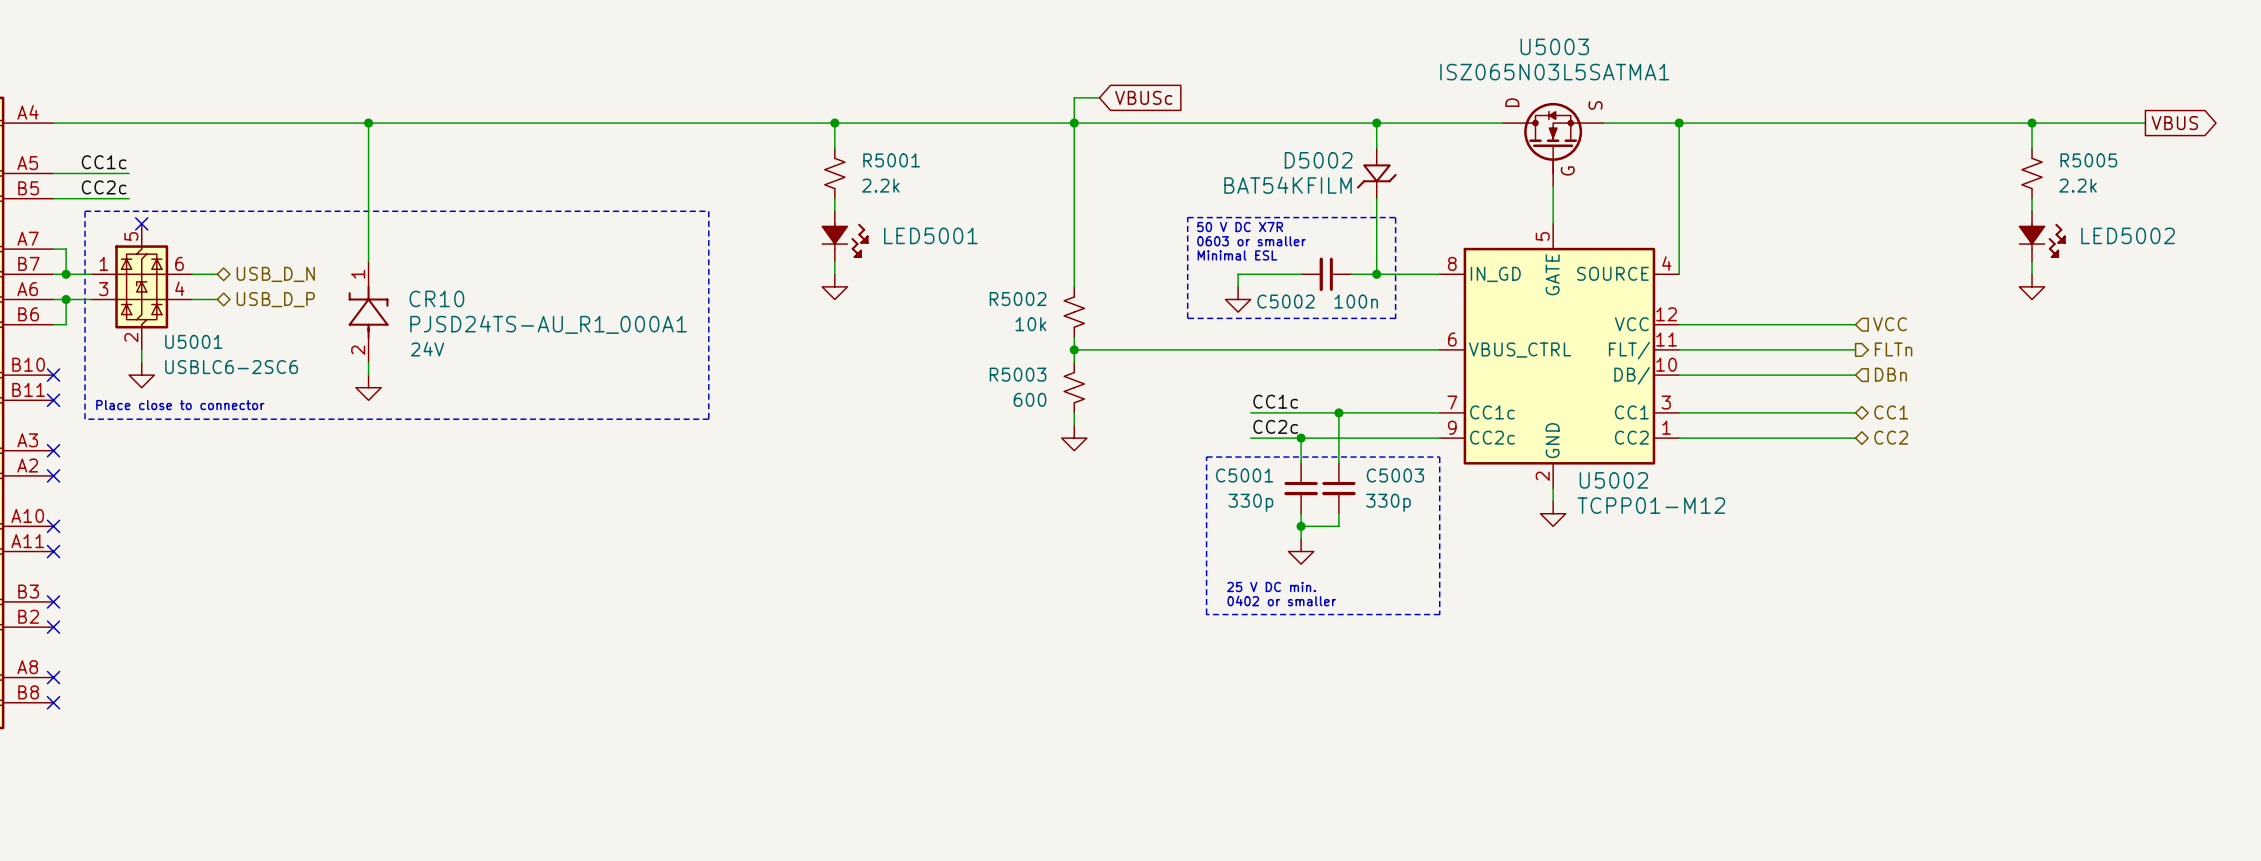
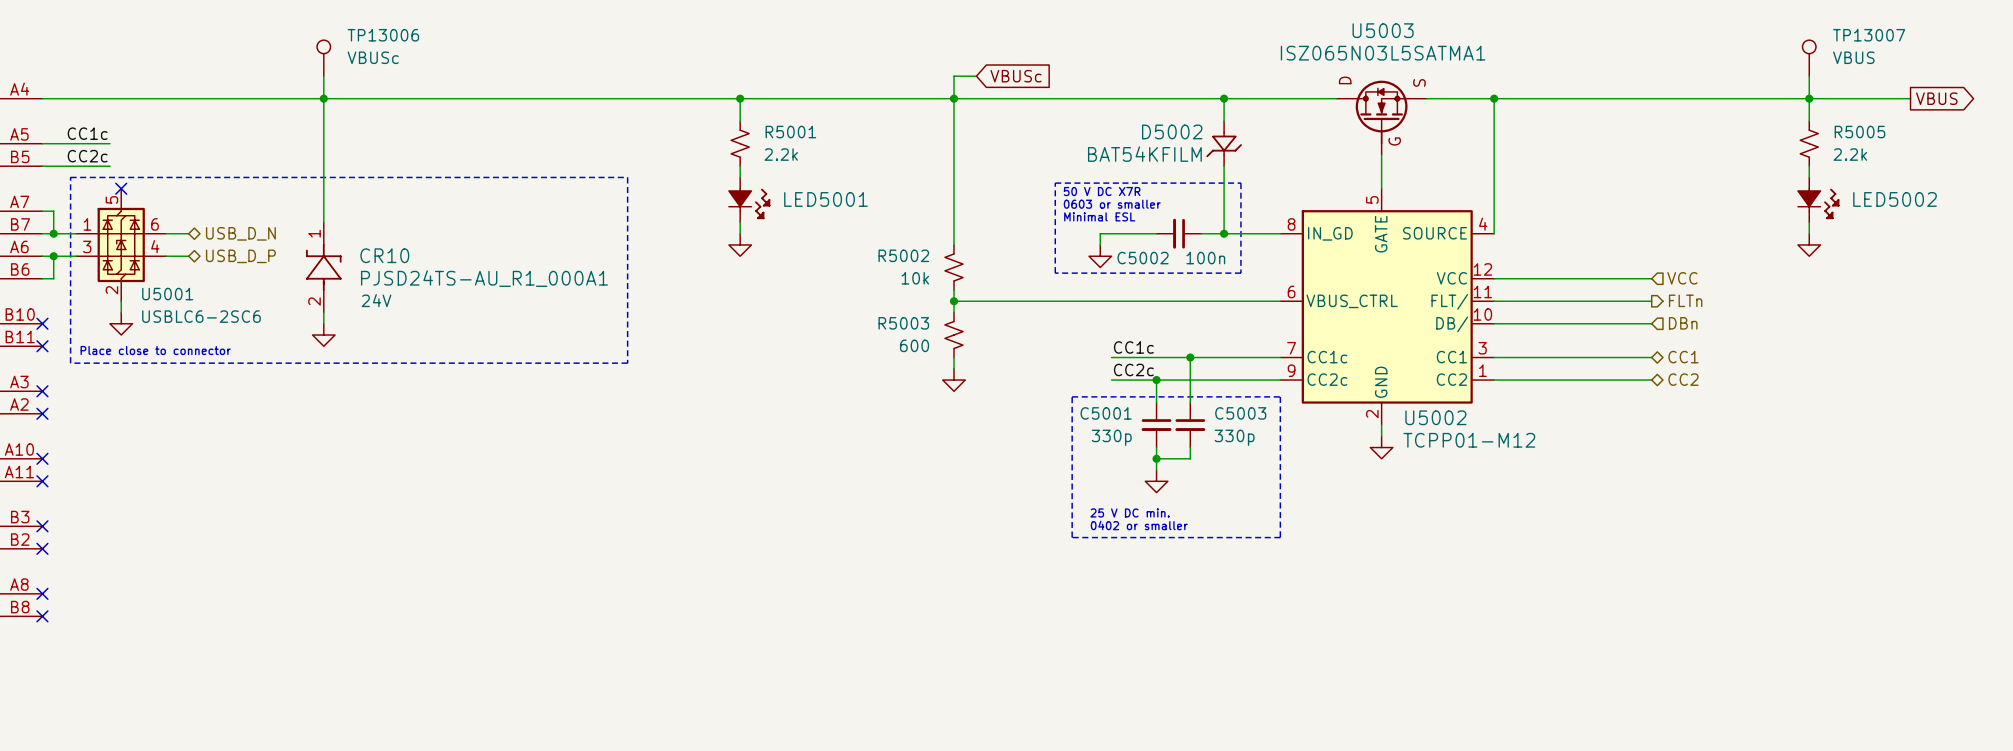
TP13006: none -> VBUSc (323, 58)
TP13007: none -> VBUS (1809, 58)
wire: none -> (323, 76) (323, 98)
wire: none -> (1809, 76) (1809, 98)

